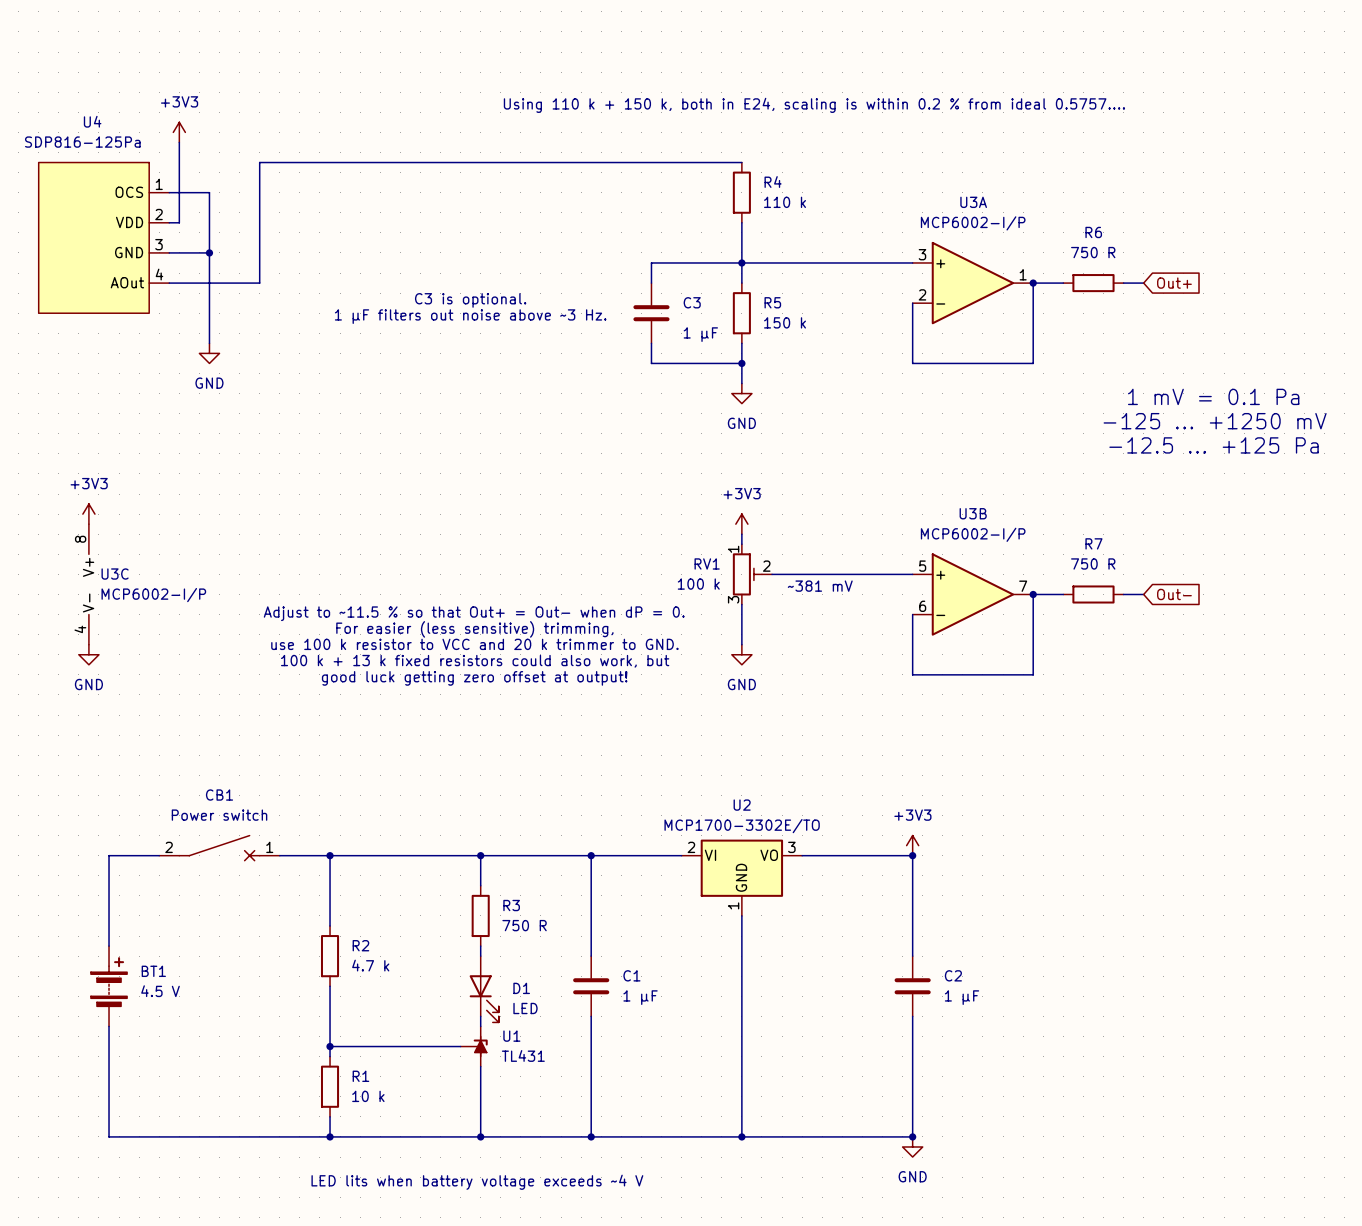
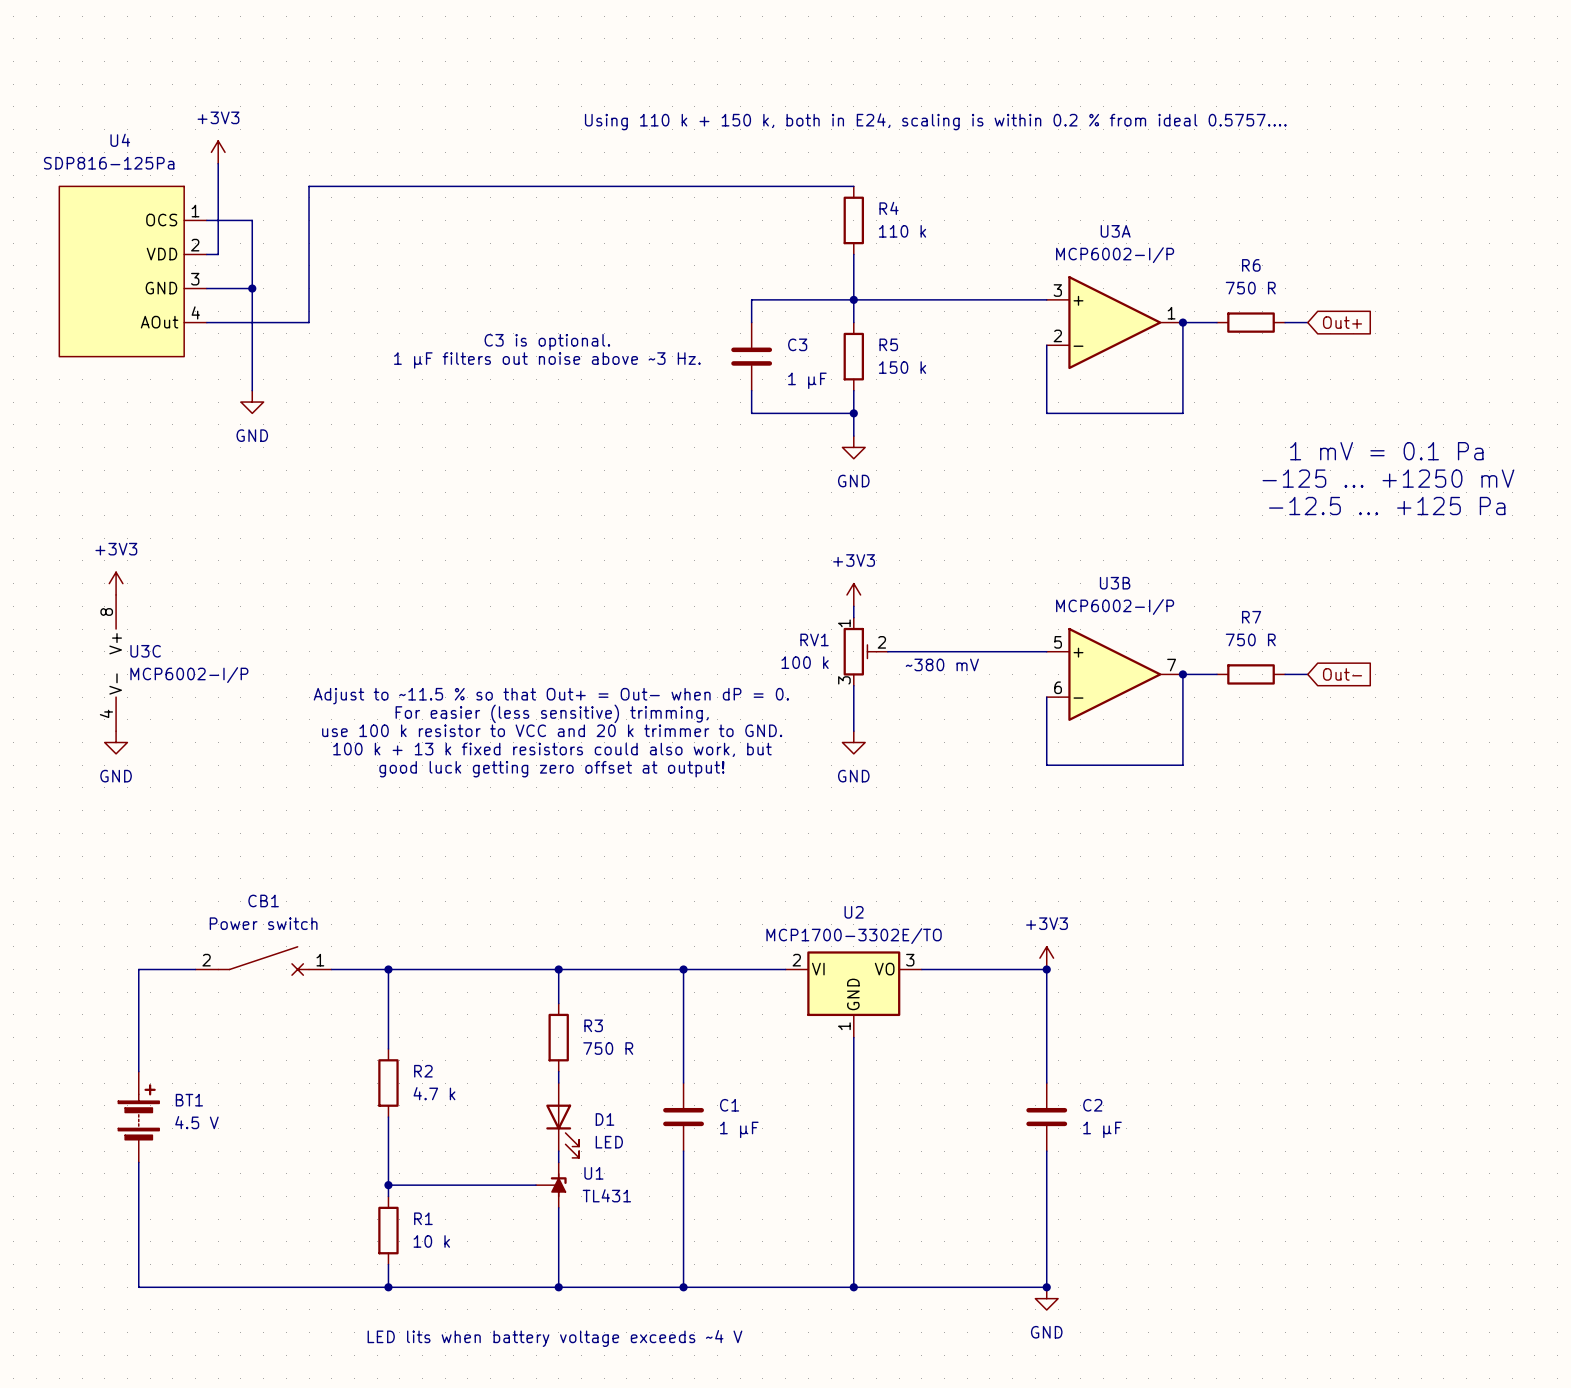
text: ~381 mV (820, 586) -> ~380 mV (942, 664)

